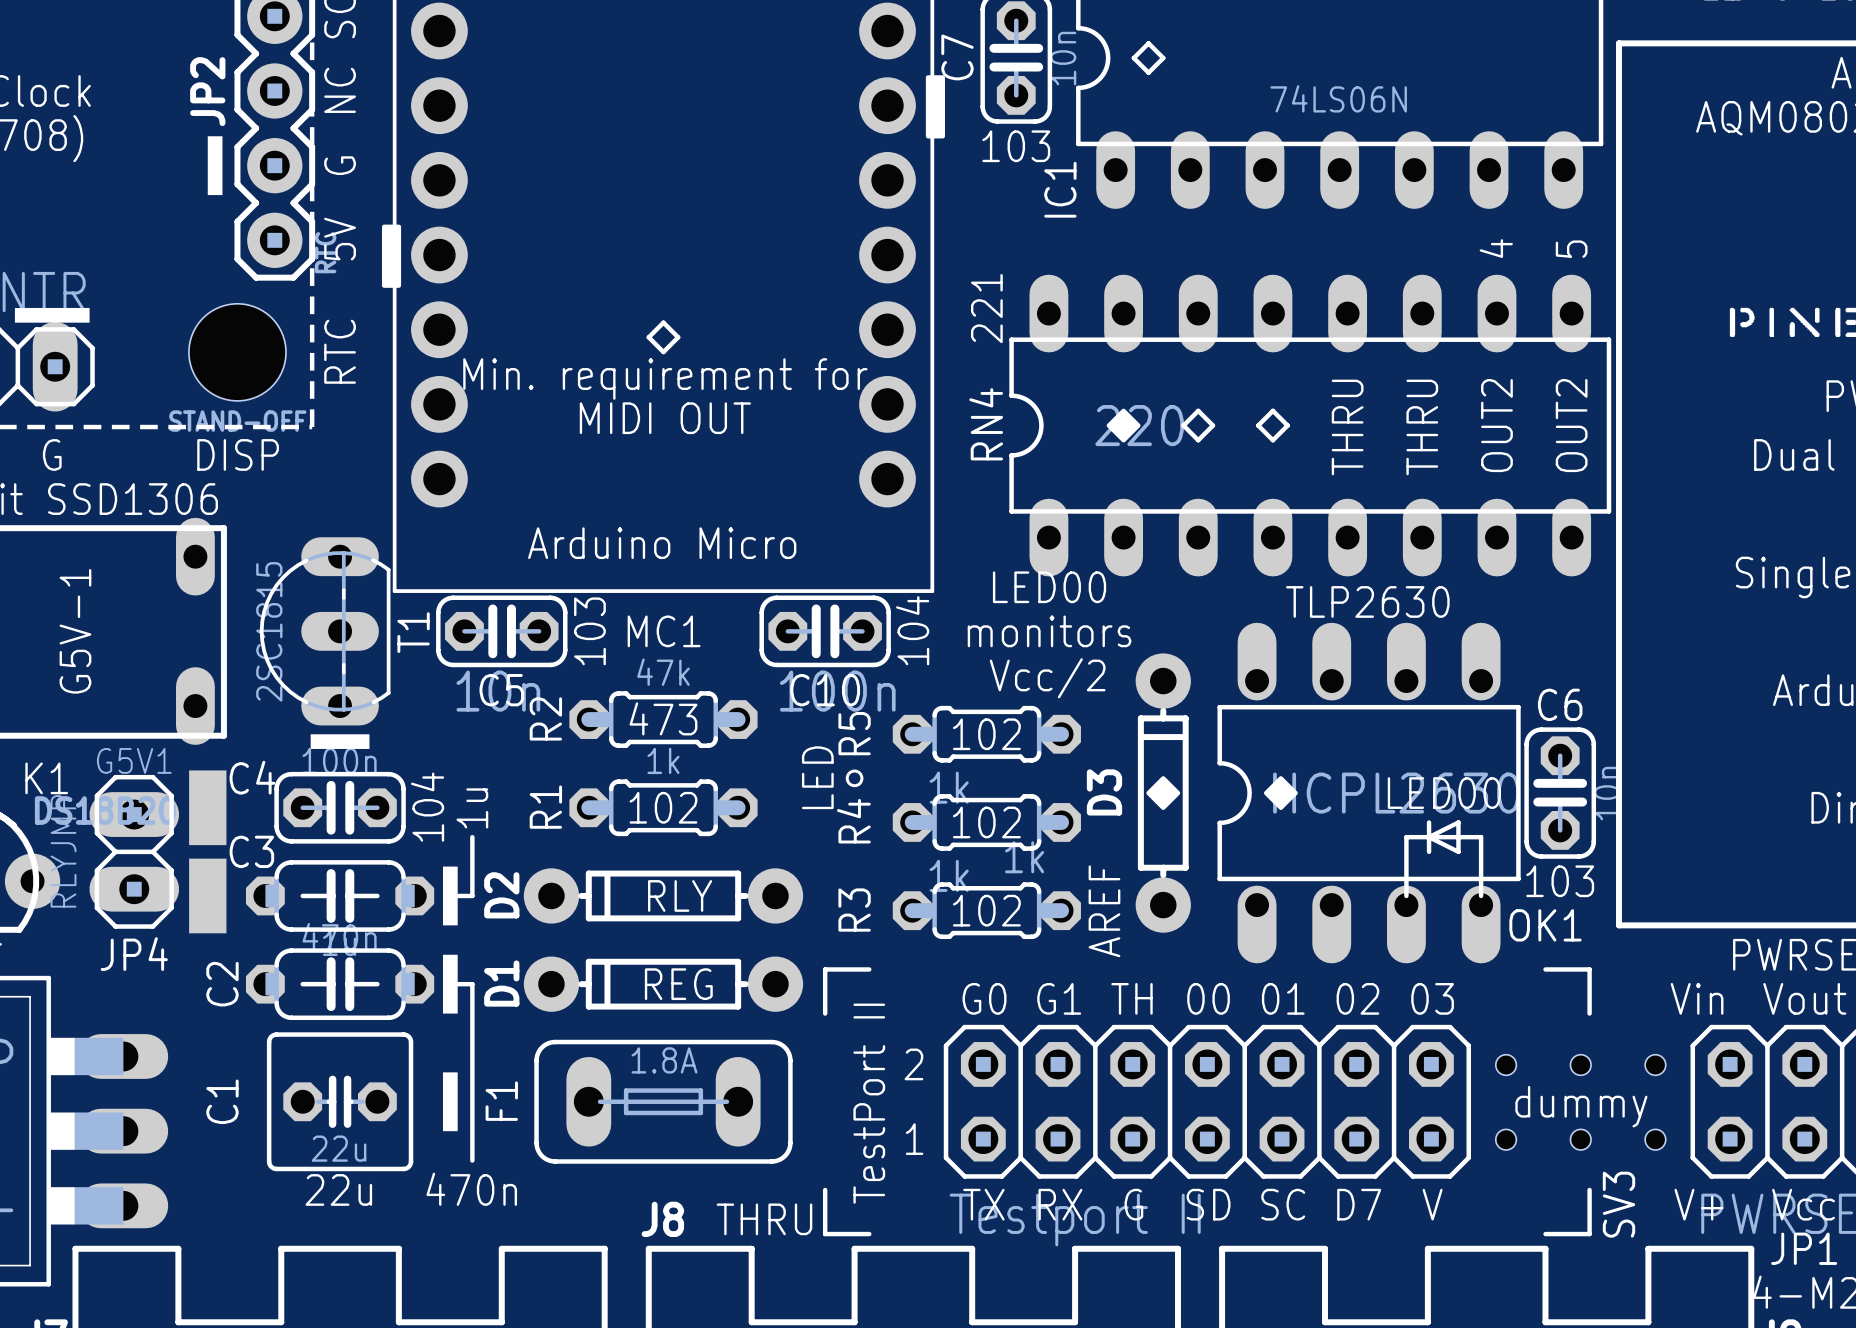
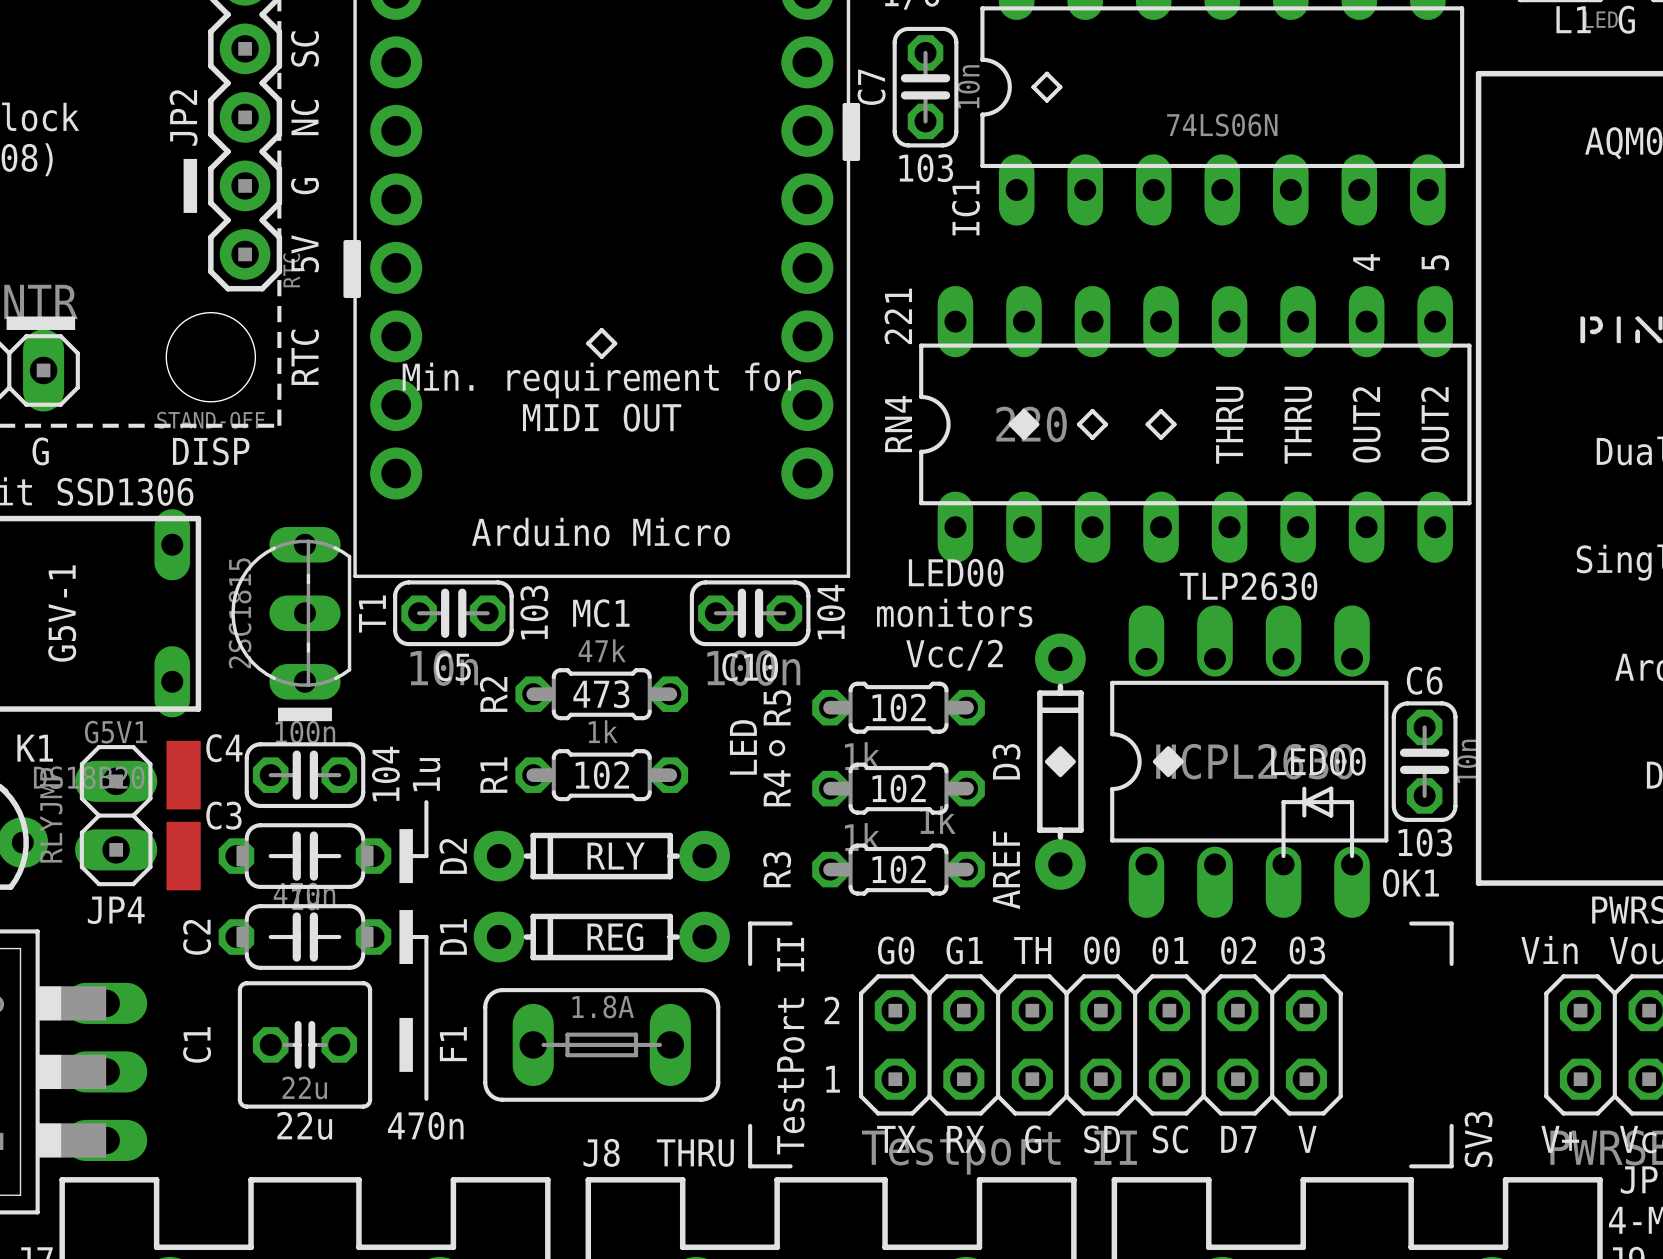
hole: (1506, 1065) -> none
hole: (1580, 1065) -> none
hole: (1655, 1065) -> none
text: dummy (1581, 1106) -> none
hole: (1506, 1139) -> none
hole: (1580, 1139) -> none
hole: (1655, 1139) -> none

